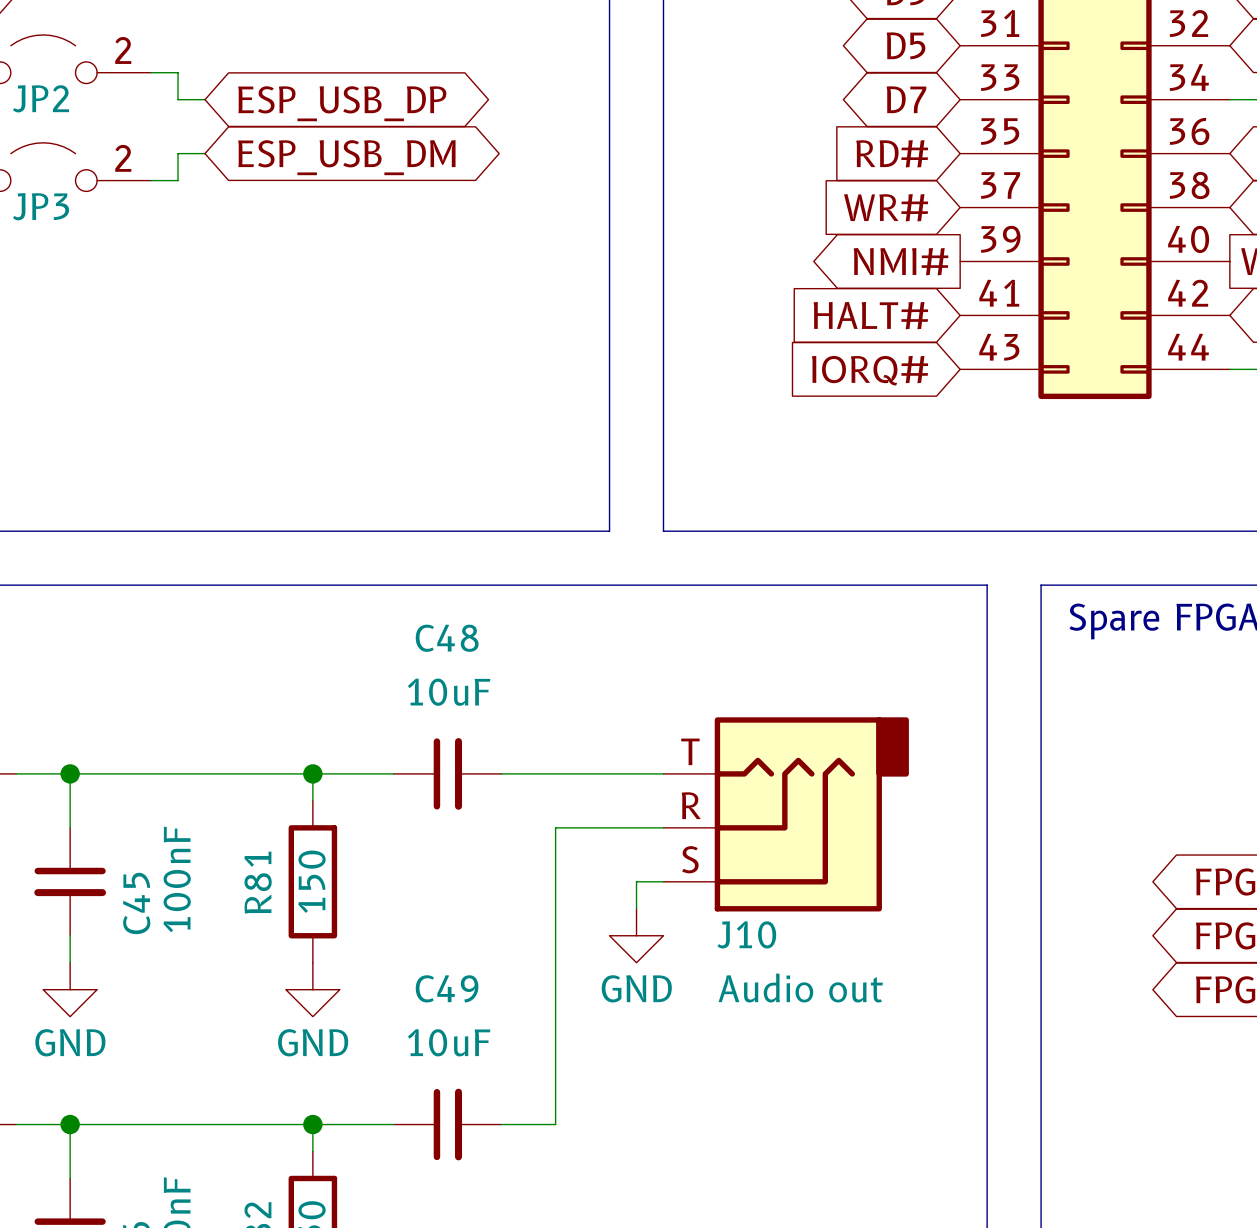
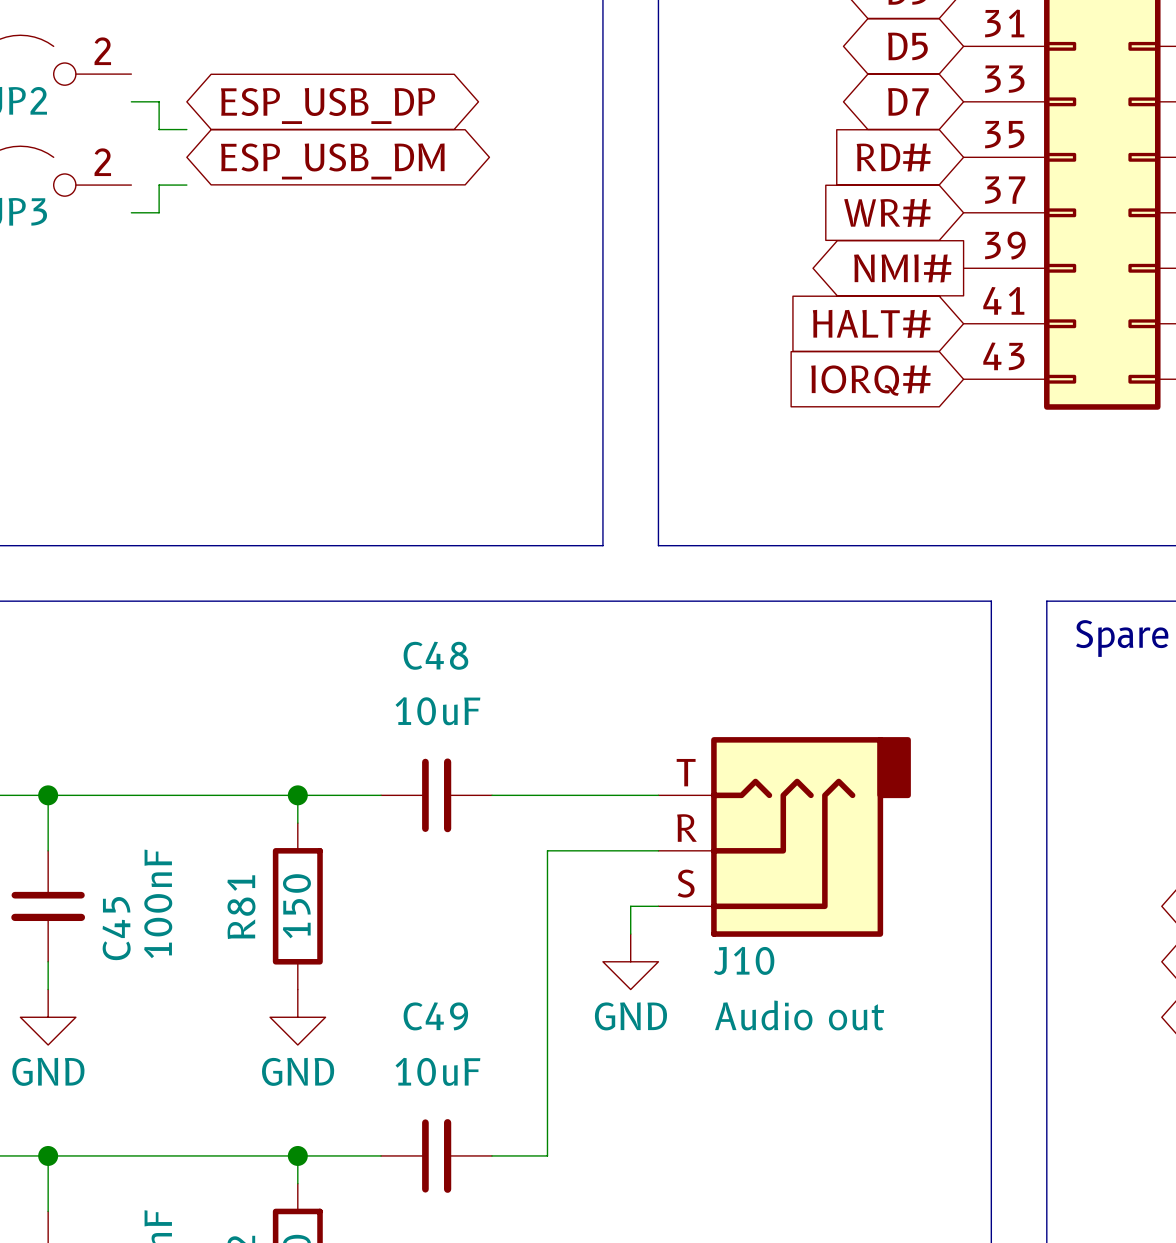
wire: (151, 72) (178, 72) (178, 99) (204, 99) -> (131, 101) (159, 101) (159, 129) (186, 129)
wire: (204, 153) (178, 153) (178, 180) (151, 180) -> (186, 185) (159, 185) (159, 212) (131, 212)

